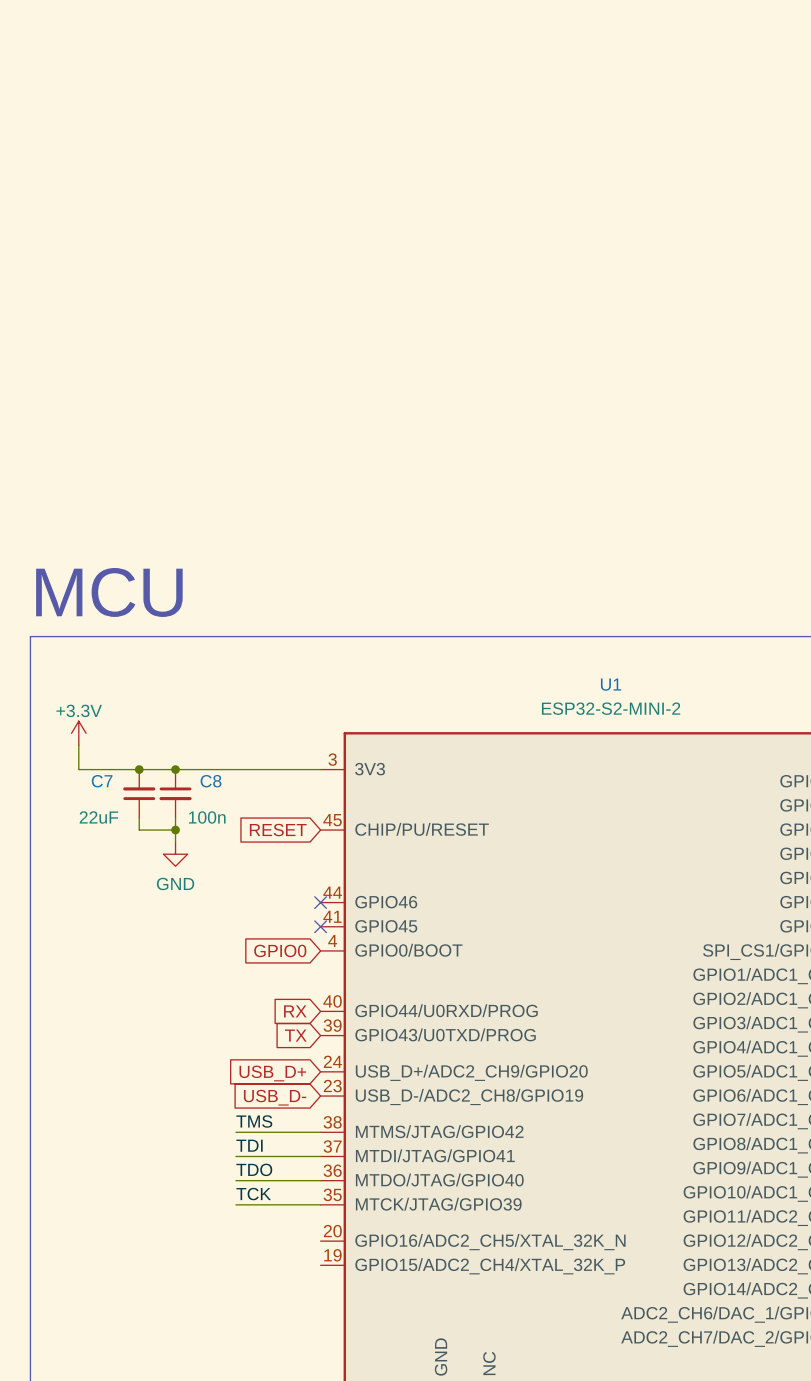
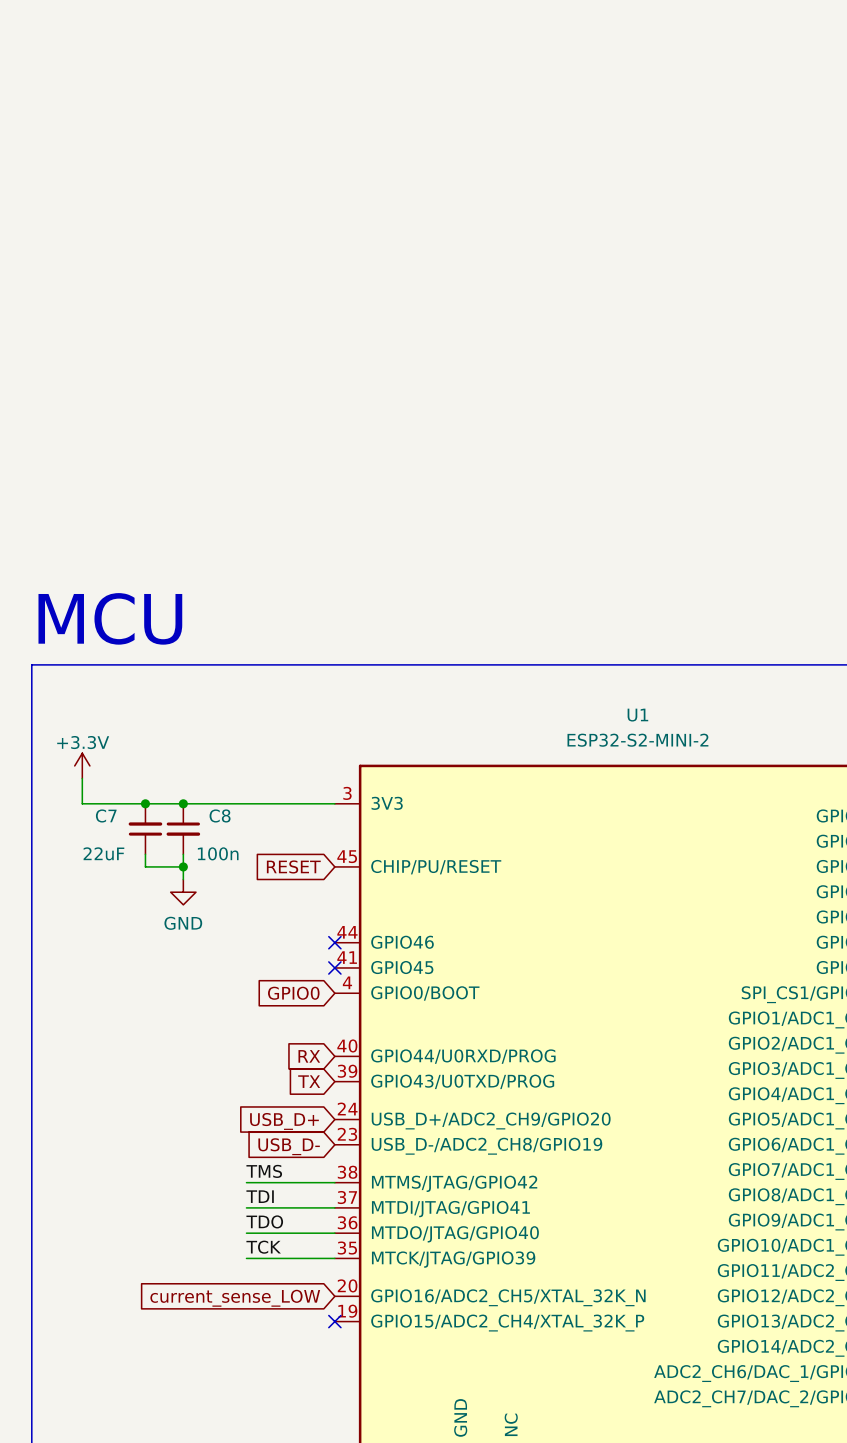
global label: none -> current_sense_LOW (235, 1298)
no-connect mark: none -> (334, 1321)

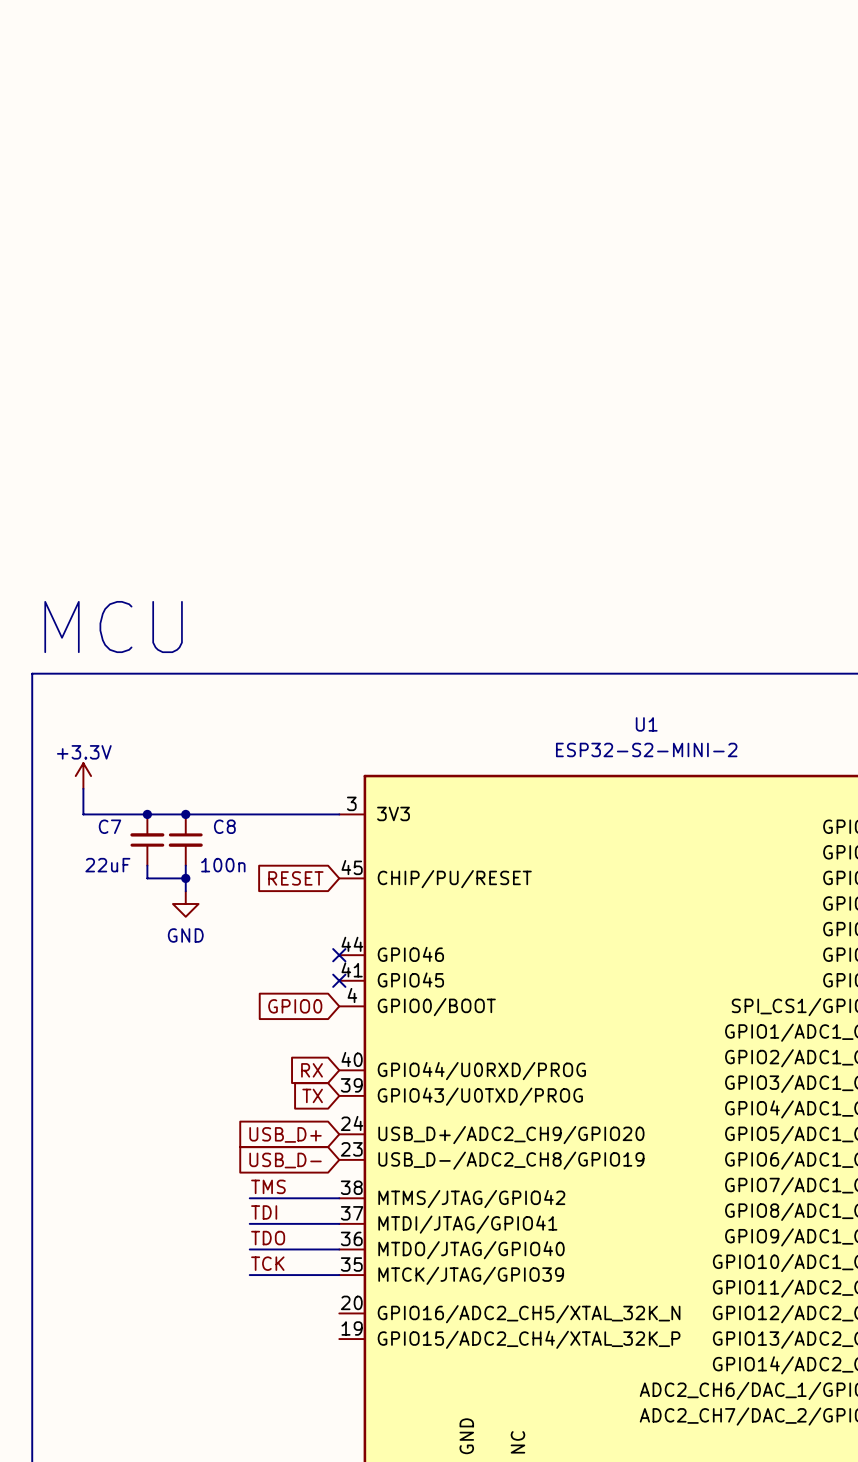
global label: current_sense_LOW (235, 1298) -> none
no-connect mark: (334, 1321) -> none

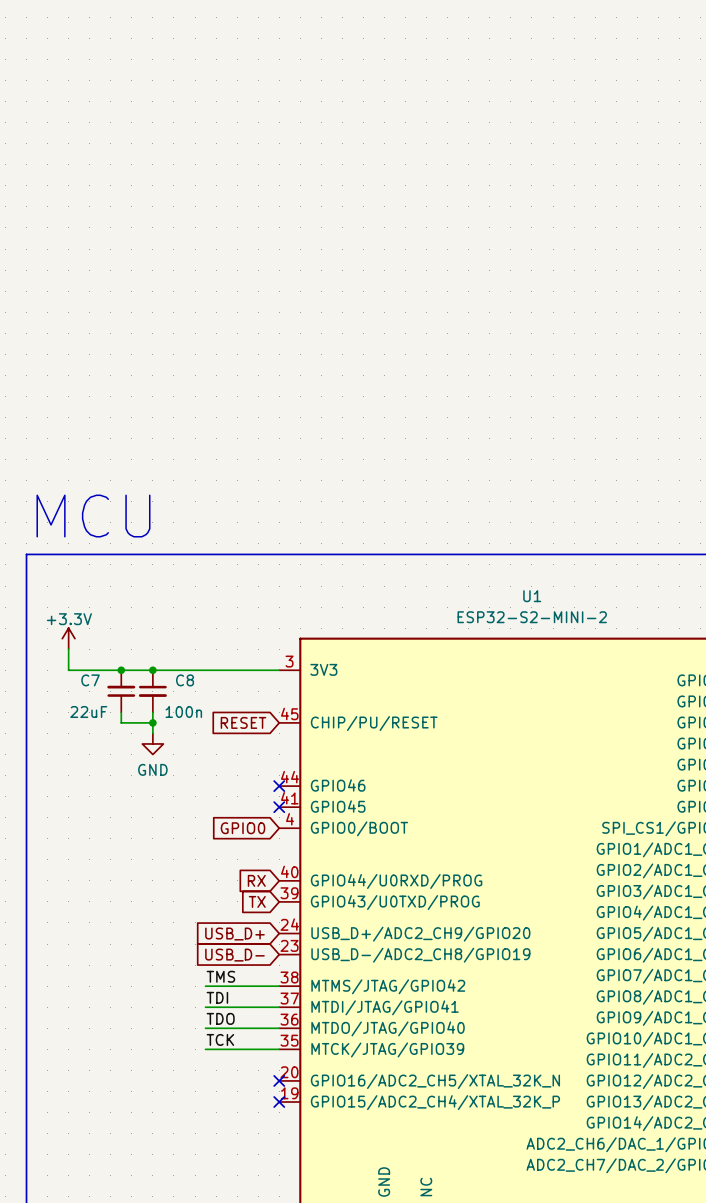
no-connect mark: none -> (279, 1080)
no-connect mark: none -> (279, 1102)

